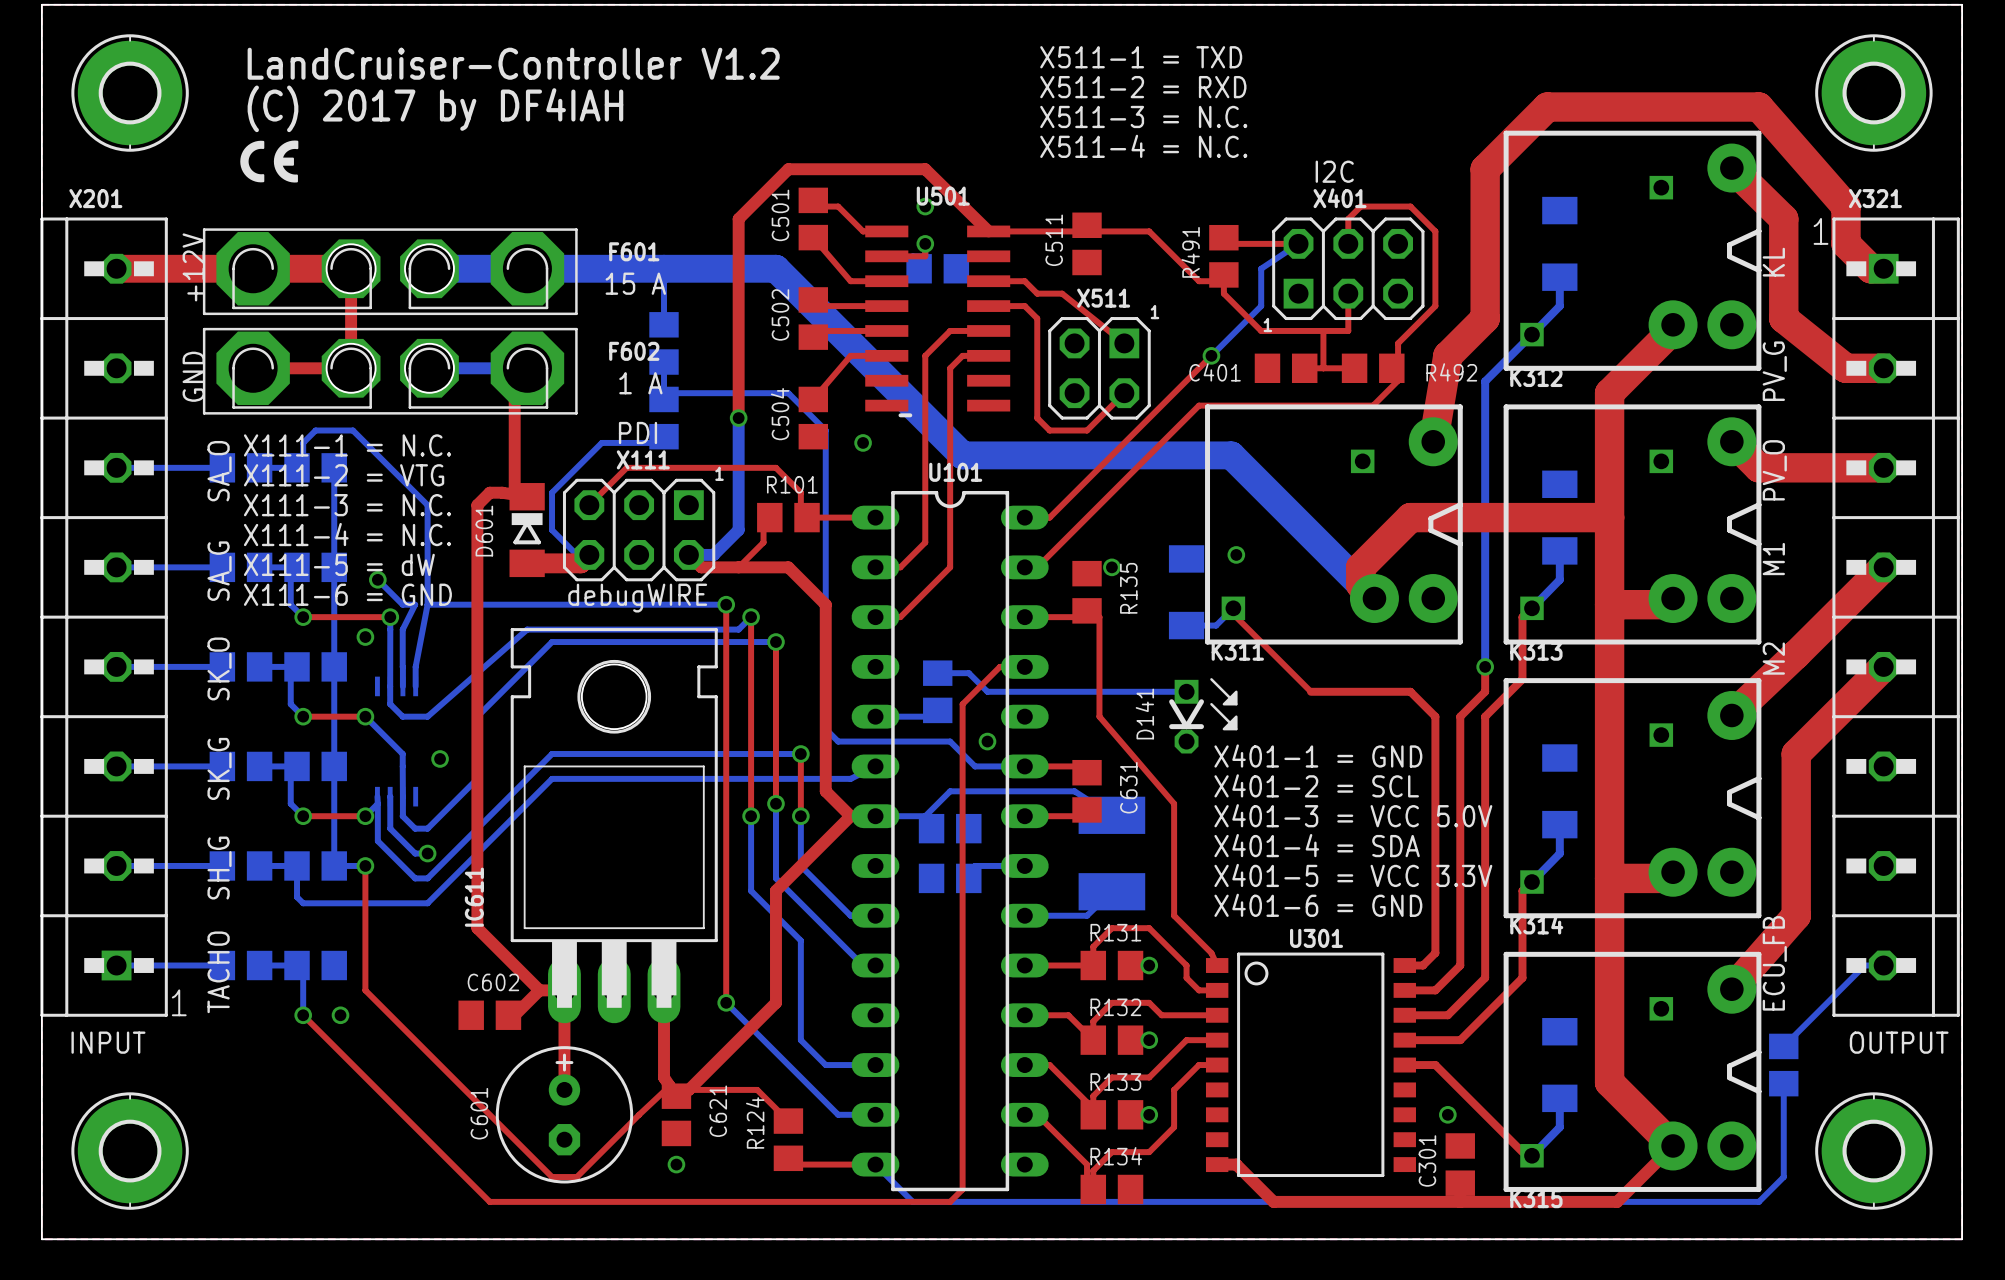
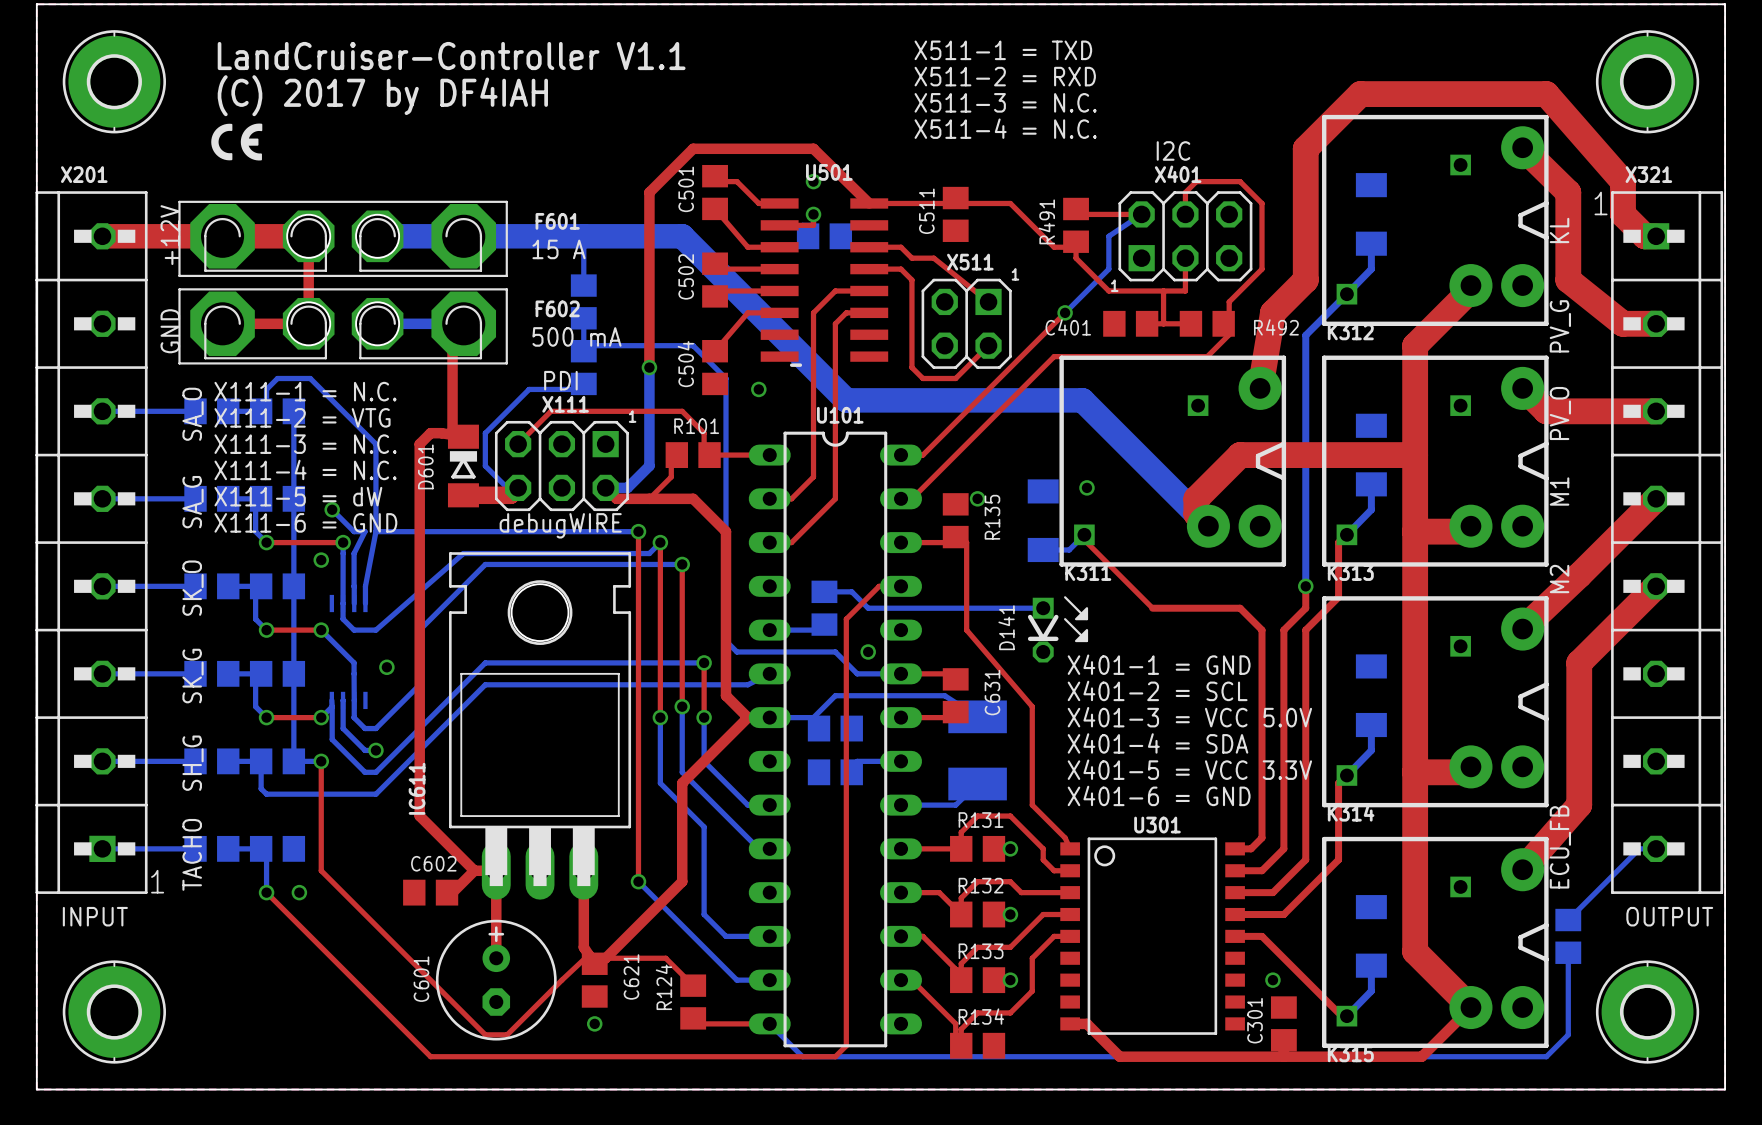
text: LandCruiser-Controller V1.2 (513, 63) -> LandCruiser-Controller V1.1 (451, 56)
text: 1 A (640, 383) -> 500 mA (576, 336)

